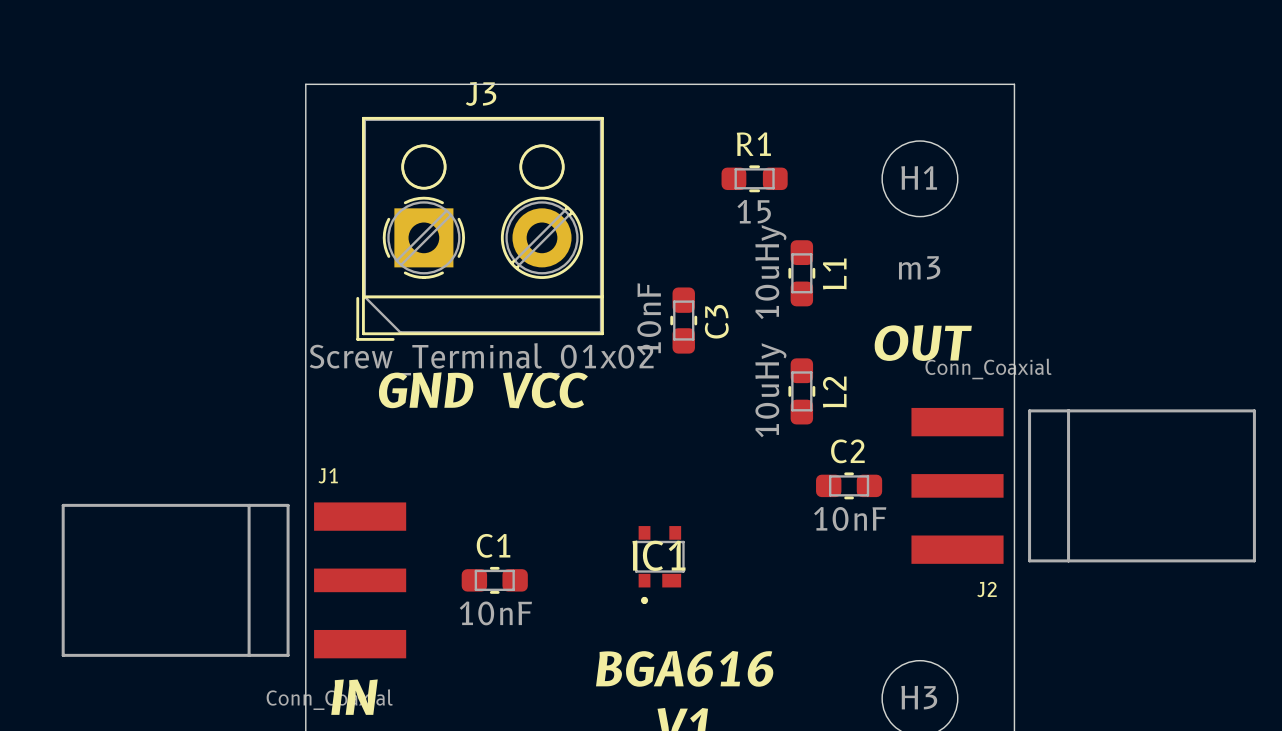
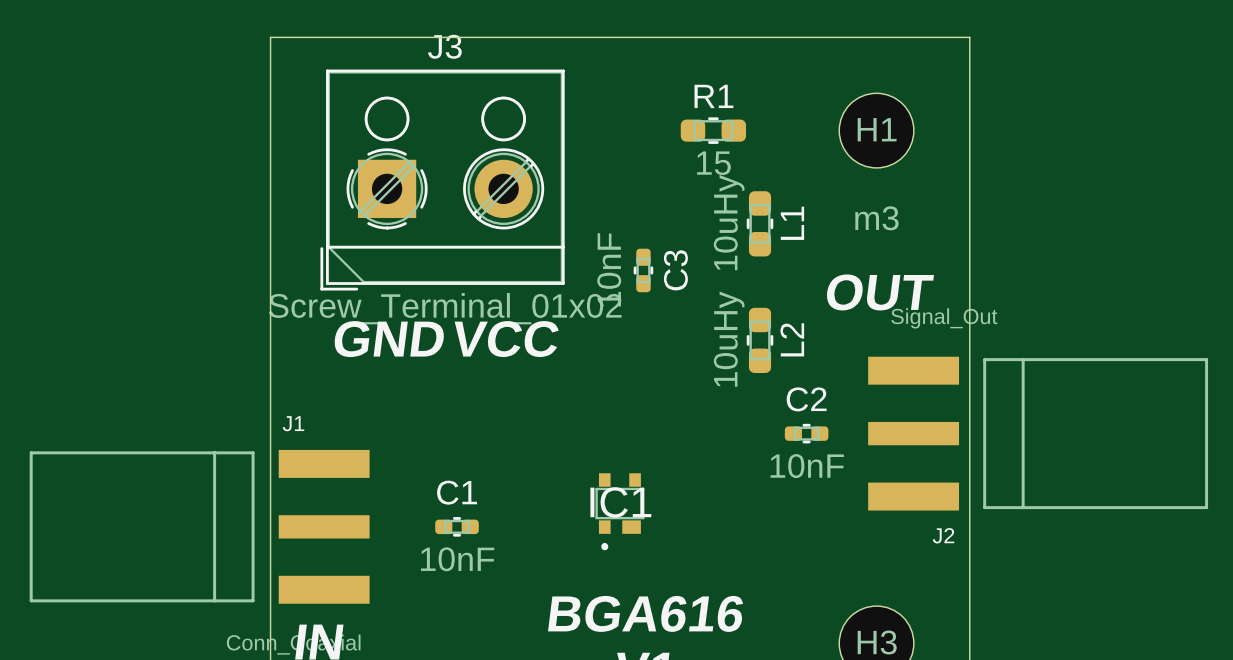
C3 footprint: [670, 287, 698, 354] -> [633, 248, 654, 293]
J2 value: Conn_Coaxial (988, 368) -> Signal_Out (944, 318)
C2 footprint: [816, 472, 883, 500] -> [784, 423, 829, 444]
C1 footprint: [461, 566, 528, 594] -> [435, 517, 479, 537]

